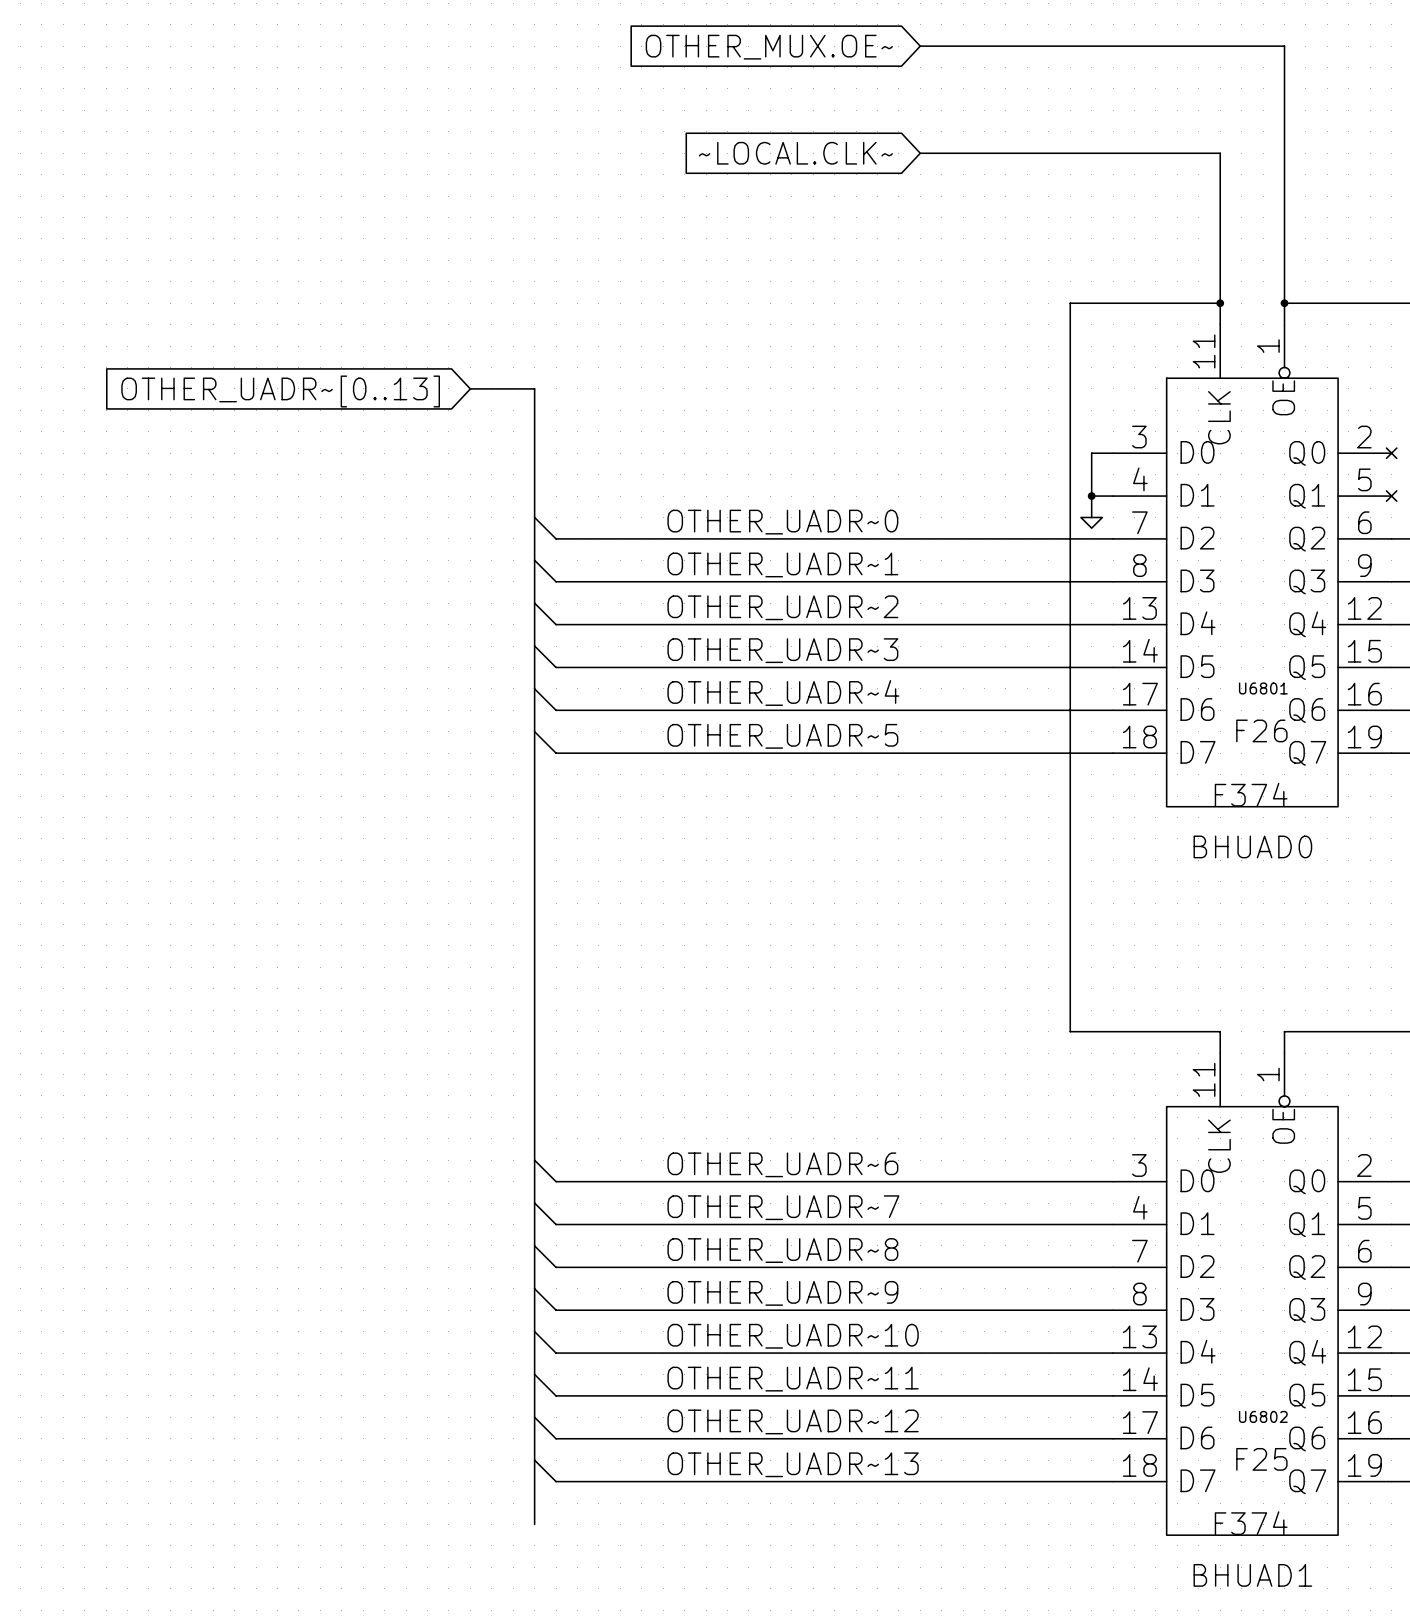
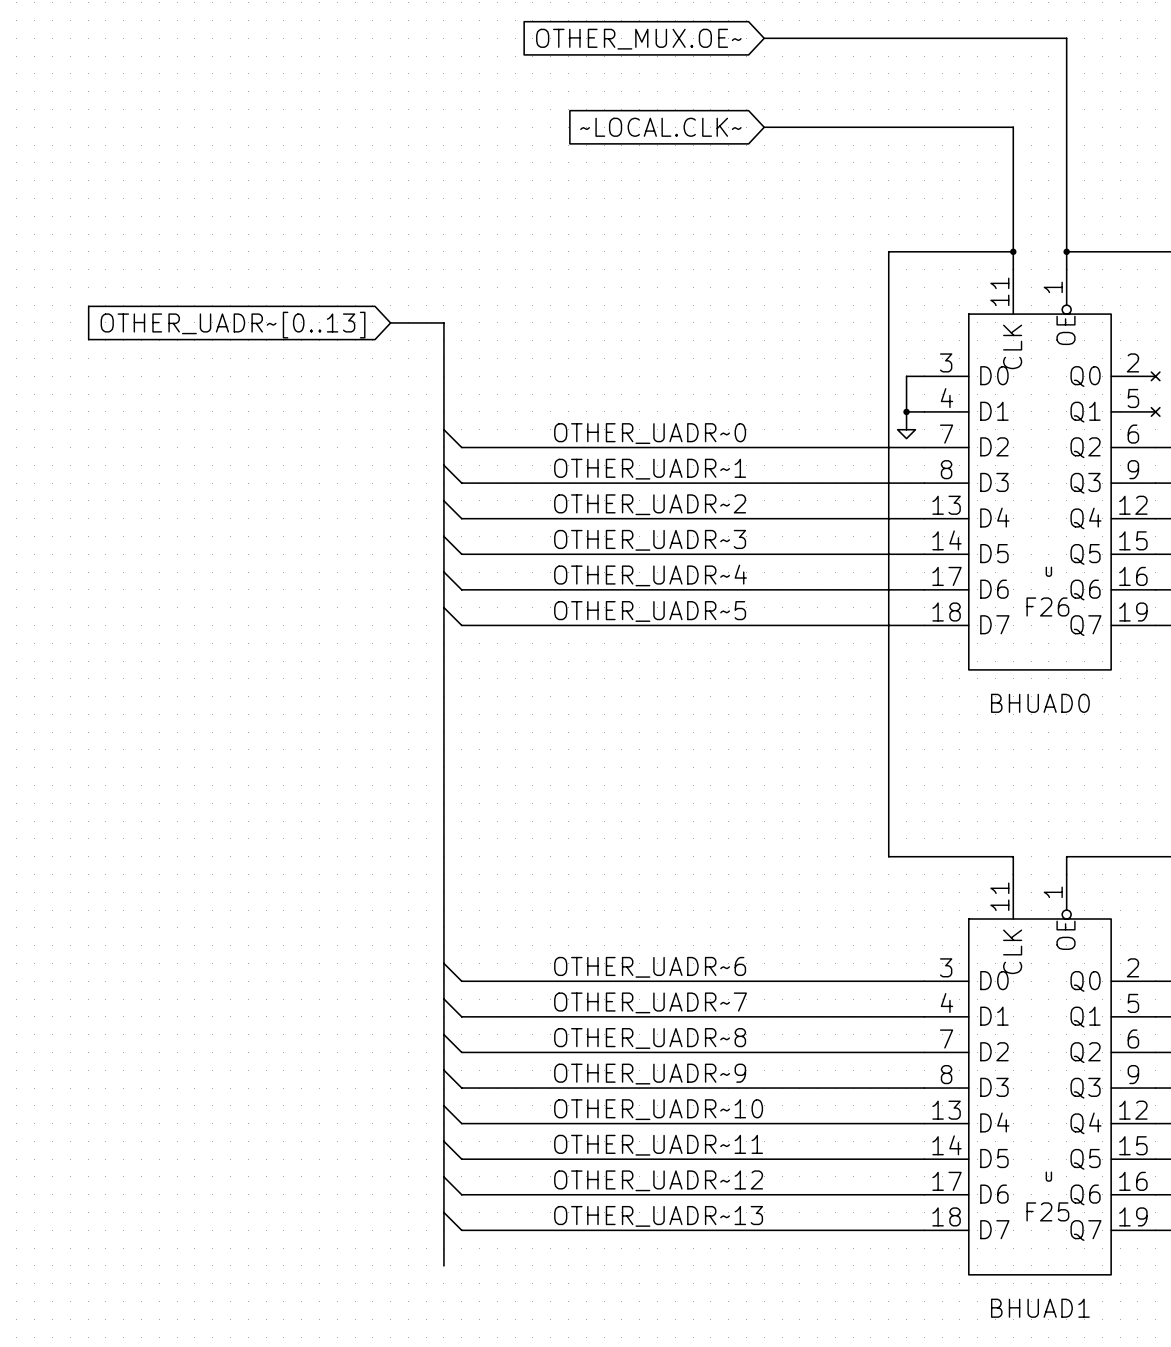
U6801 name: U6801 (1263, 688) -> U (1048, 571)
U6801 value: F374 (1251, 794) -> none
U6802 name: U6802 (1263, 1416) -> U (1048, 1176)
U6802 value: F374 (1251, 1523) -> none

